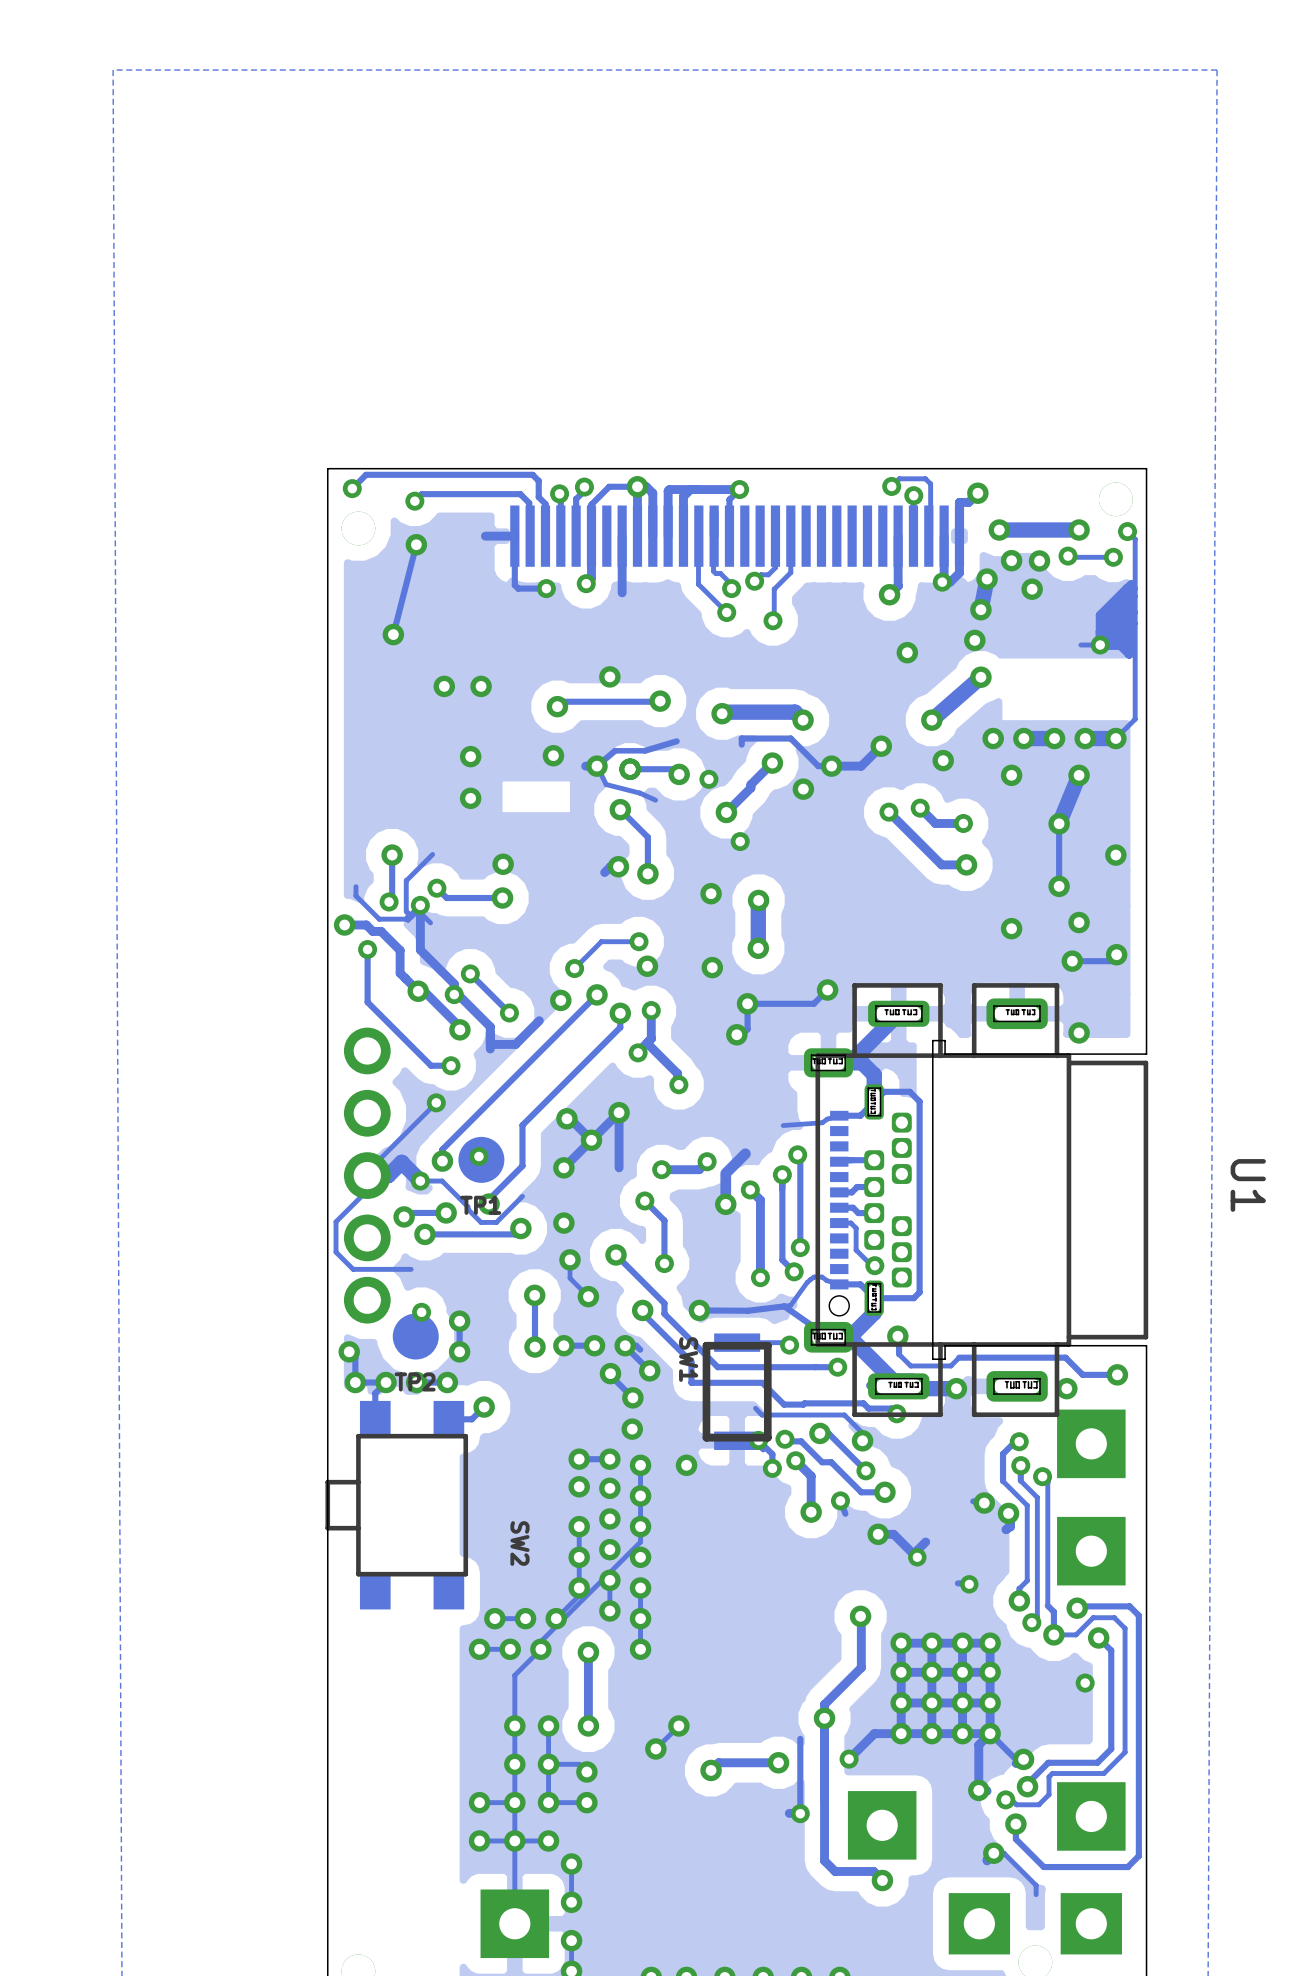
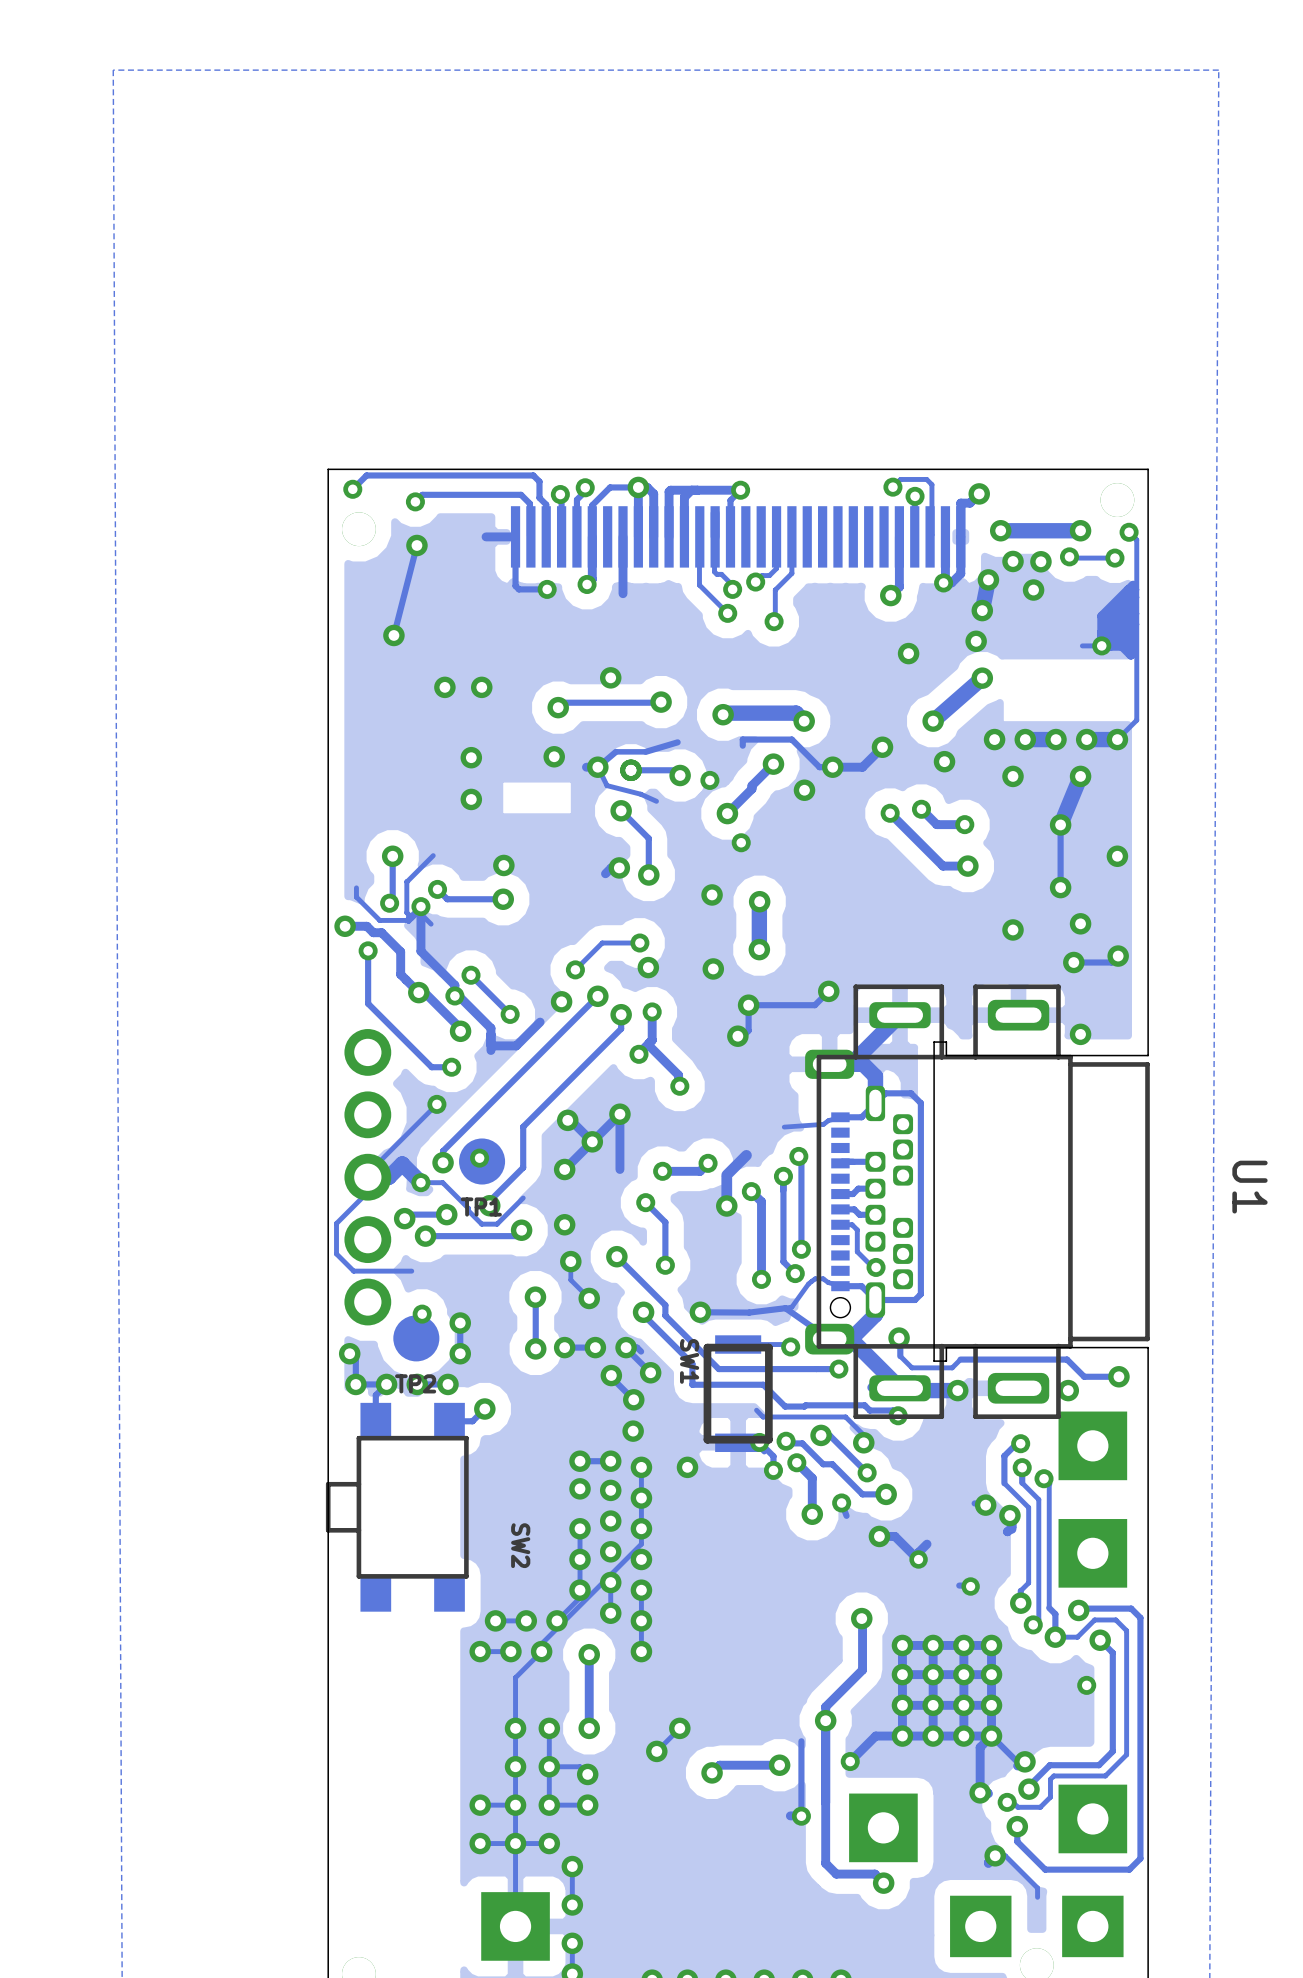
board edge: (921, 1006) (921, 1021) (875, 1021) (875, 1006) (921, 1006) -> none
board edge: (1039, 1006) (1039, 1021) (993, 1021) (993, 1006) (1039, 1006) -> none
board edge: (886, 1009) (886, 1014) -> none
board edge: (888, 1009) (885, 1009) -> none
board edge: (893, 1009) (893, 1014) (890, 1014) (890, 1009) -> none
board edge: (898, 1009) (898, 1014) (895, 1014) (895, 1009) (898, 1009) -> none
board edge: (904, 1009) (904, 1014) -> none
board edge: (905, 1009) (902, 1009) -> none
board edge: (911, 1009) (911, 1014) (908, 1014) (908, 1009) -> none
board edge: (913, 1009) (916, 1009) (916, 1014) (913, 1014) -> none
board edge: (1007, 1009) (1007, 1014) -> none
board edge: (1009, 1009) (1006, 1009) -> none
board edge: (1013, 1009) (1013, 1014) (1011, 1014) (1011, 1009) -> none
board edge: (1018, 1009) (1018, 1014) (1016, 1014) (1017, 1009) -> none
board edge: (1023, 1009) (1023, 1014) -> none
board edge: (1025, 1009) (1022, 1009) -> none
board edge: (1030, 1009) (1030, 1014) (1027, 1014) (1027, 1009) -> none
board edge: (1032, 1009) (1034, 1009) (1034, 1014) (1032, 1014) -> none
board edge: (845, 1055) (845, 1070) (811, 1070) (811, 1055) (845, 1055) -> none
board edge: (814, 1059) (814, 1063) -> none
board edge: (816, 1059) (813, 1059) -> none
board edge: (819, 1059) (819, 1063) (817, 1063) (817, 1059) -> none
board edge: (825, 1059) (825, 1063) (822, 1063) (822, 1059) (825, 1059) -> none
board edge: (829, 1059) (829, 1063) -> none
board edge: (831, 1059) (828, 1059) -> none
board edge: (836, 1059) (836, 1063) (833, 1063) (833, 1059) -> none
board edge: (839, 1059) (842, 1059) (842, 1063) (839, 1063) -> none
board edge: (880, 1088) (880, 1115) (868, 1115) (868, 1088) (880, 1088) -> none
board edge: (875, 1089) (875, 1091) -> none
board edge: (875, 1090) (871, 1090) -> none
board edge: (875, 1093) (871, 1093) (871, 1095) (875, 1095) -> none
board edge: (871, 1099) (875, 1098) (875, 1100) (871, 1100) -> none
board edge: (875, 1102) (875, 1104) -> none
board edge: (875, 1103) (871, 1103) -> none
board edge: (875, 1106) (871, 1106) (871, 1108) (875, 1108) -> none
board edge: (875, 1111) (875, 1113) (871, 1113) (871, 1111) -> none
board edge: (880, 1283) (880, 1311) (868, 1311) (868, 1283) (880, 1283) -> none
board edge: (875, 1284) (875, 1286) -> none
board edge: (875, 1285) (872, 1285) -> none
board edge: (875, 1288) (872, 1288) (872, 1291) (875, 1291) -> none
board edge: (875, 1293) (875, 1295) (872, 1295) (872, 1293) (875, 1293) -> none
board edge: (875, 1298) (875, 1301) -> none
board edge: (875, 1299) (872, 1299) -> none
board edge: (875, 1303) (872, 1303) (872, 1305) (875, 1305) -> none
board edge: (875, 1308) (875, 1309) (872, 1308) -> none
board edge: (845, 1329) (845, 1344) (811, 1344) (811, 1329) (845, 1329) -> none
board edge: (814, 1333) (814, 1338) -> none
board edge: (816, 1333) (813, 1333) -> none
board edge: (819, 1333) (819, 1338) (817, 1338) (817, 1333) -> none
board edge: (825, 1333) (822, 1333) (822, 1338) (825, 1338) (825, 1333) -> none
board edge: (829, 1333) (829, 1338) -> none
board edge: (831, 1333) (828, 1333) -> none
board edge: (836, 1333) (836, 1338) (833, 1338) (833, 1333) -> none
board edge: (839, 1333) (842, 1333) (842, 1338) (839, 1338) -> none
board edge: (921, 1378) (875, 1378) (875, 1394) (921, 1394) (921, 1378) -> none
board edge: (1039, 1378) (1039, 1394) (993, 1394) (993, 1378) (1039, 1378) -> none
board edge: (1007, 1381) (1007, 1387) -> none
board edge: (1008, 1381) (1005, 1381) -> none
board edge: (1013, 1381) (1013, 1387) (1010, 1387) (1010, 1381) -> none
board edge: (1019, 1381) (1016, 1381) (1016, 1387) (1019, 1387) (1019, 1381) -> none
board edge: (1024, 1381) (1024, 1387) -> none
board edge: (1026, 1381) (1023, 1381) -> none
board edge: (1031, 1381) (1031, 1387) (1028, 1387) (1028, 1381) -> none
board edge: (1033, 1381) (1036, 1381) (1036, 1387) (1033, 1387) -> none
board edge: (890, 1382) (890, 1387) -> none
board edge: (892, 1382) (888, 1382) -> none
board edge: (896, 1382) (896, 1387) (894, 1387) (894, 1382) -> none
board edge: (901, 1382) (898, 1382) (898, 1387) (901, 1387) (901, 1382) -> none
board edge: (906, 1382) (906, 1387) -> none
board edge: (908, 1382) (905, 1382) -> none
board edge: (912, 1382) (912, 1387) (910, 1387) (910, 1382) -> none
board edge: (915, 1382) (918, 1382) (918, 1387) (915, 1387) -> none

